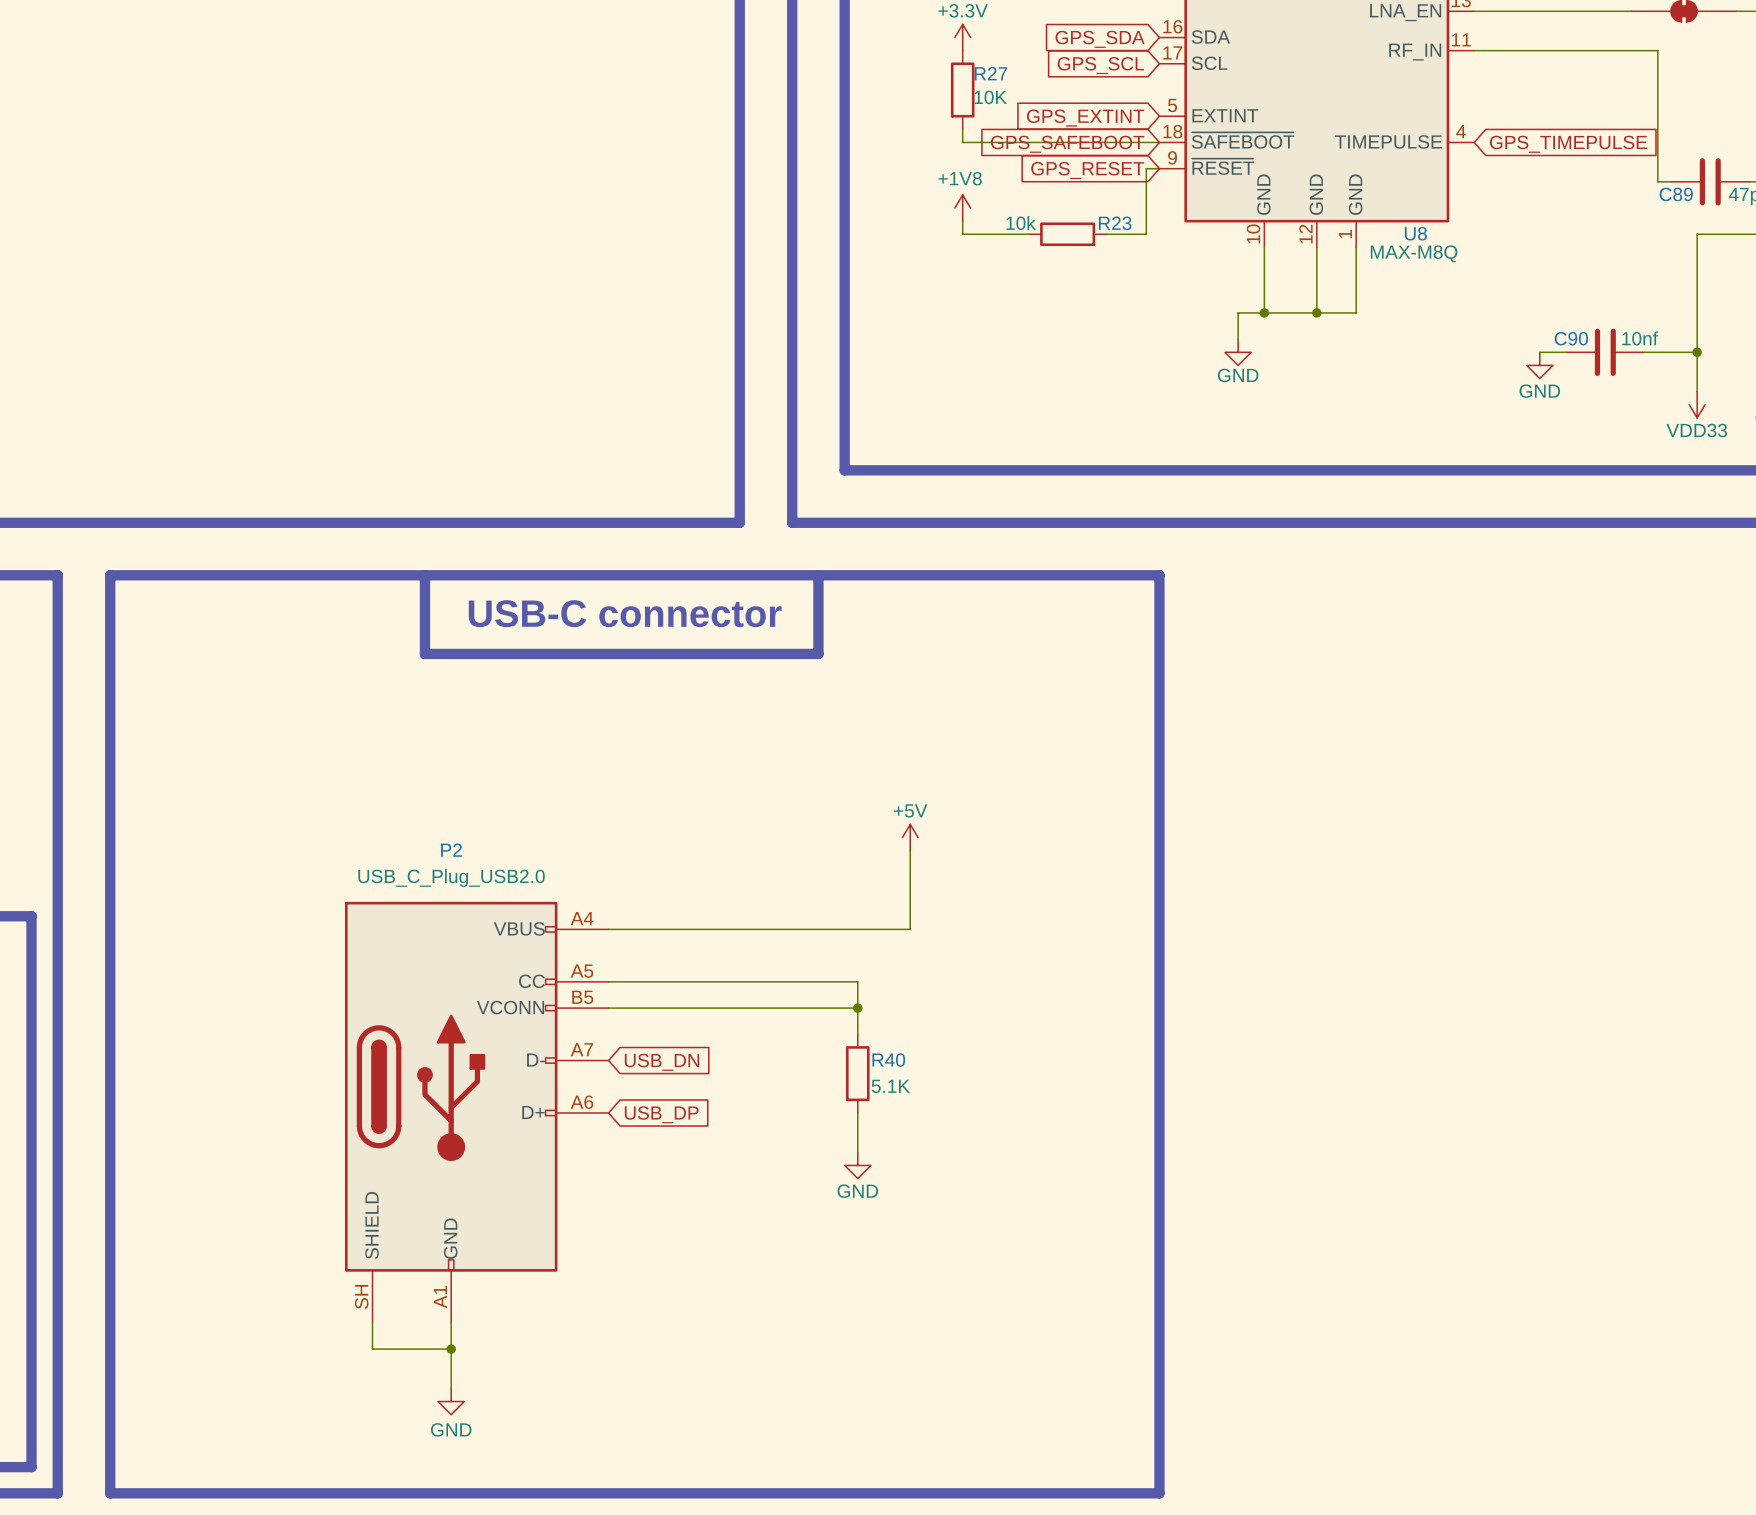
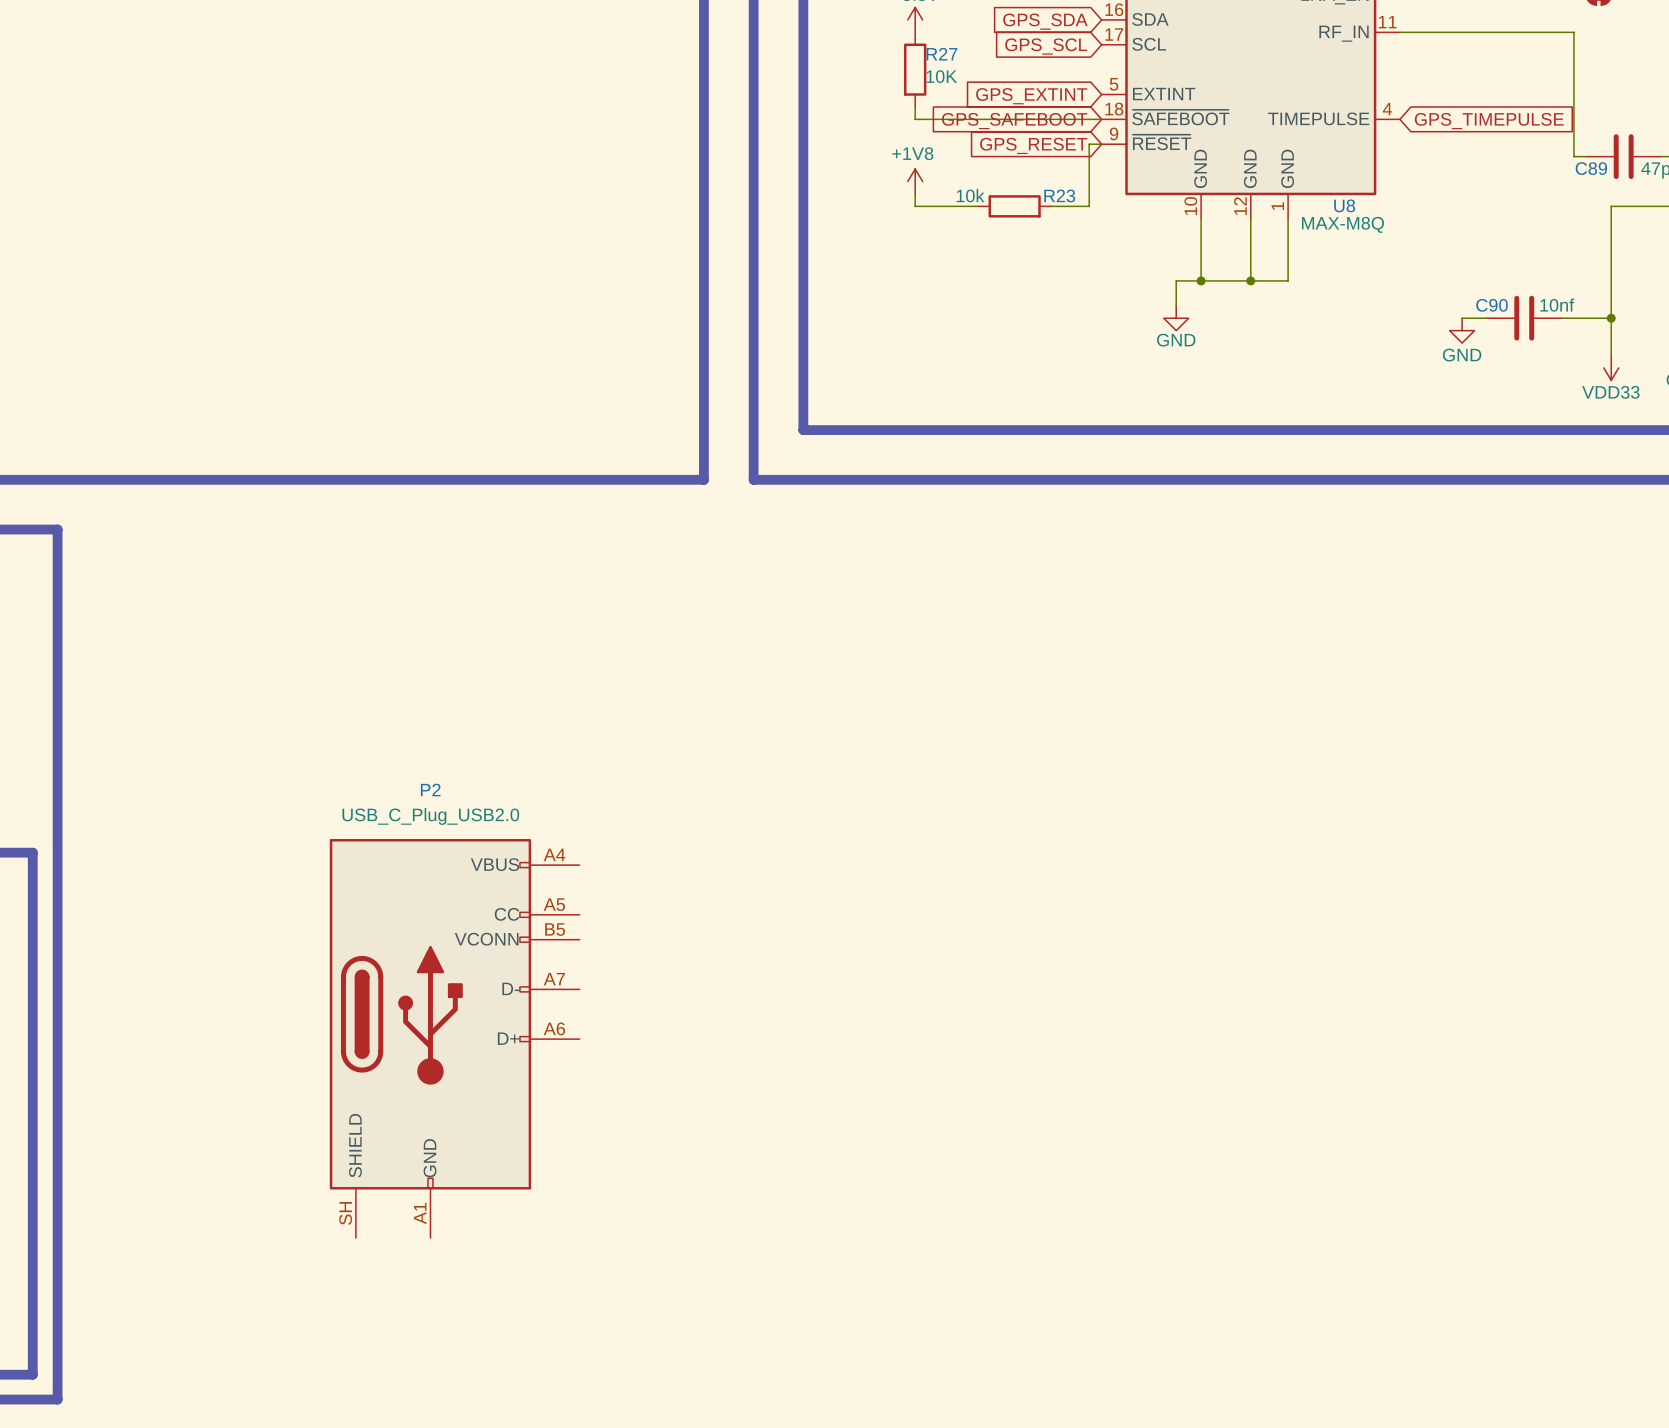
line: (110, 575) (1159, 575) (1159, 1493) (110, 1493) (110, 575) -> none
line: (424, 575) (424, 653) (818, 653) (818, 575) -> none
text: USB-C connector (625, 613) -> none
power symbol: +5V (910, 837) -> none
wire: (910, 850) (910, 929) (608, 929) -> none
wire: (608, 981) (857, 981) (857, 1034) -> none
wire: (608, 1008) (857, 1008) -> none
junction: (857, 1008) -> none
global label: USB_DN (661, 1062) -> none
R40: 5.1K (857, 1073) -> none
wire: (857, 1113) (857, 1152) -> none
global label: USB_DP (661, 1114) -> none
power symbol: GND (857, 1165) -> none
wire: (372, 1322) (372, 1349) (451, 1349) -> none
wire: (451, 1322) (451, 1388) -> none
junction: (451, 1349) -> none
power symbol: GND (451, 1401) -> none

